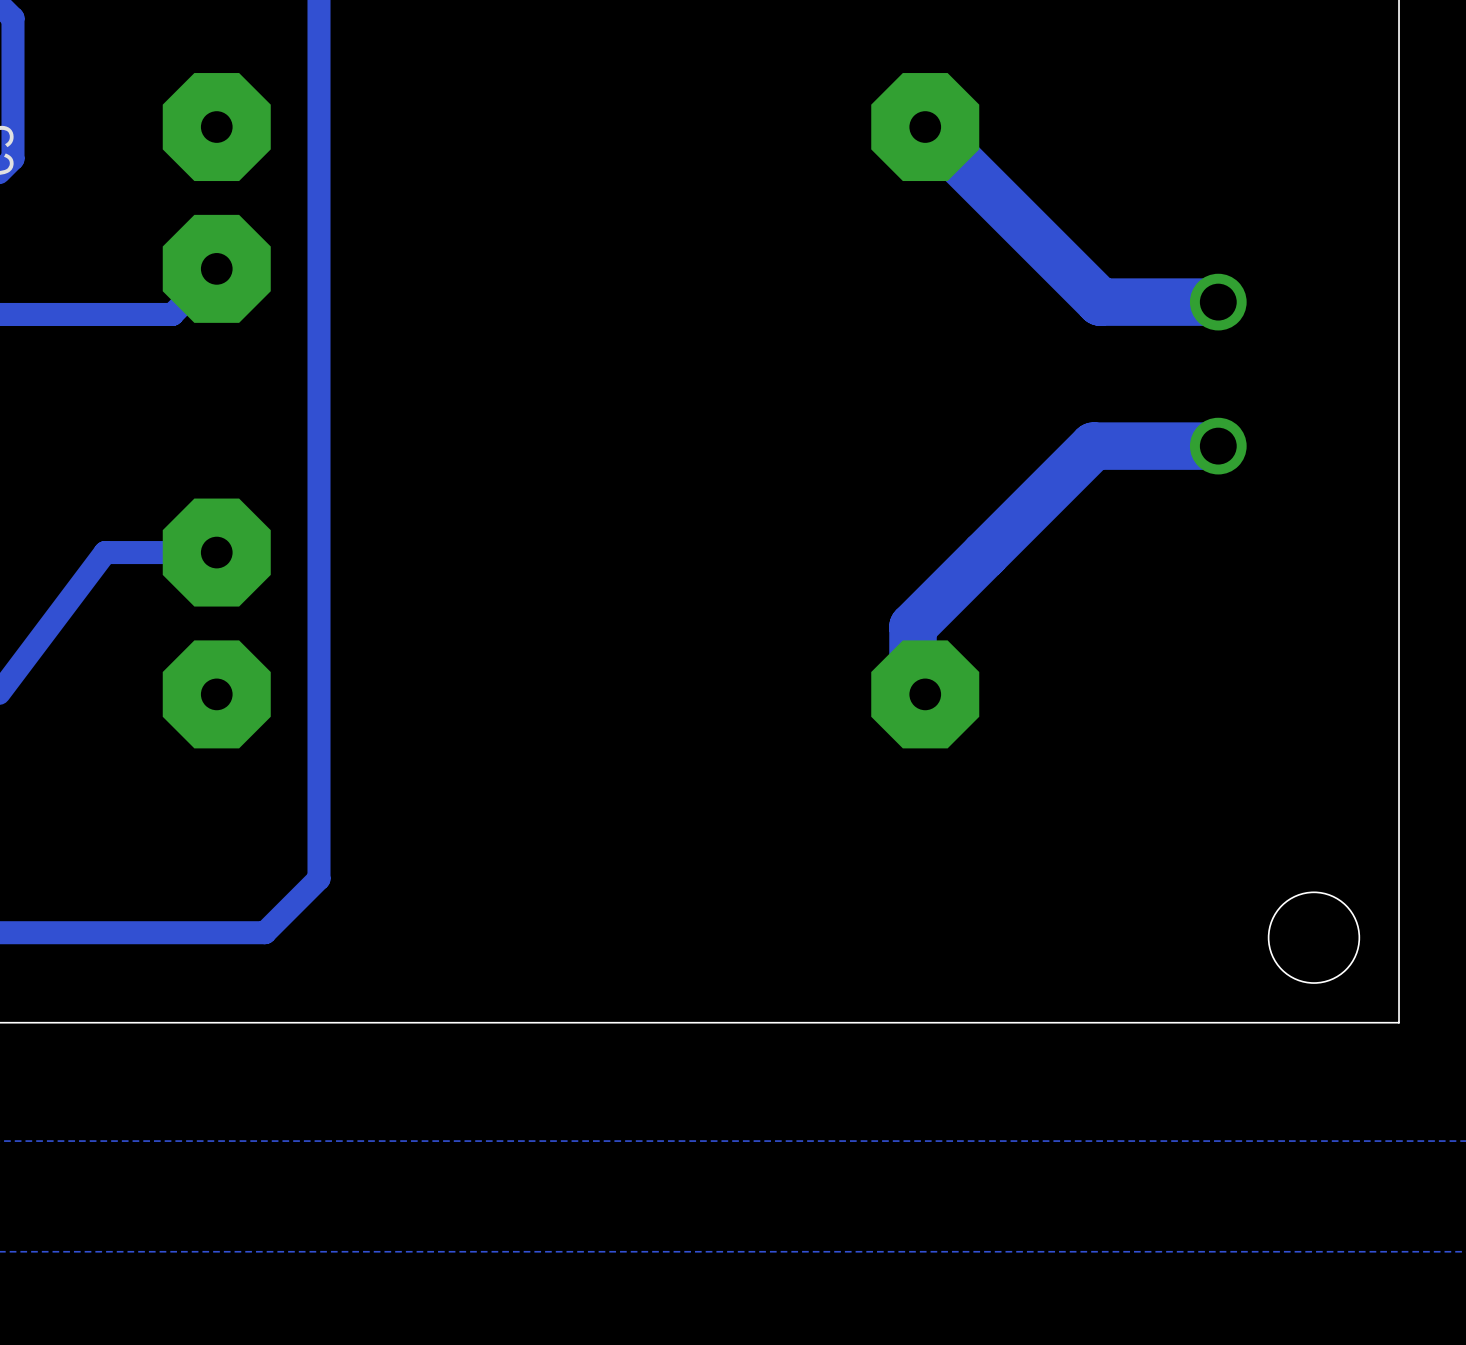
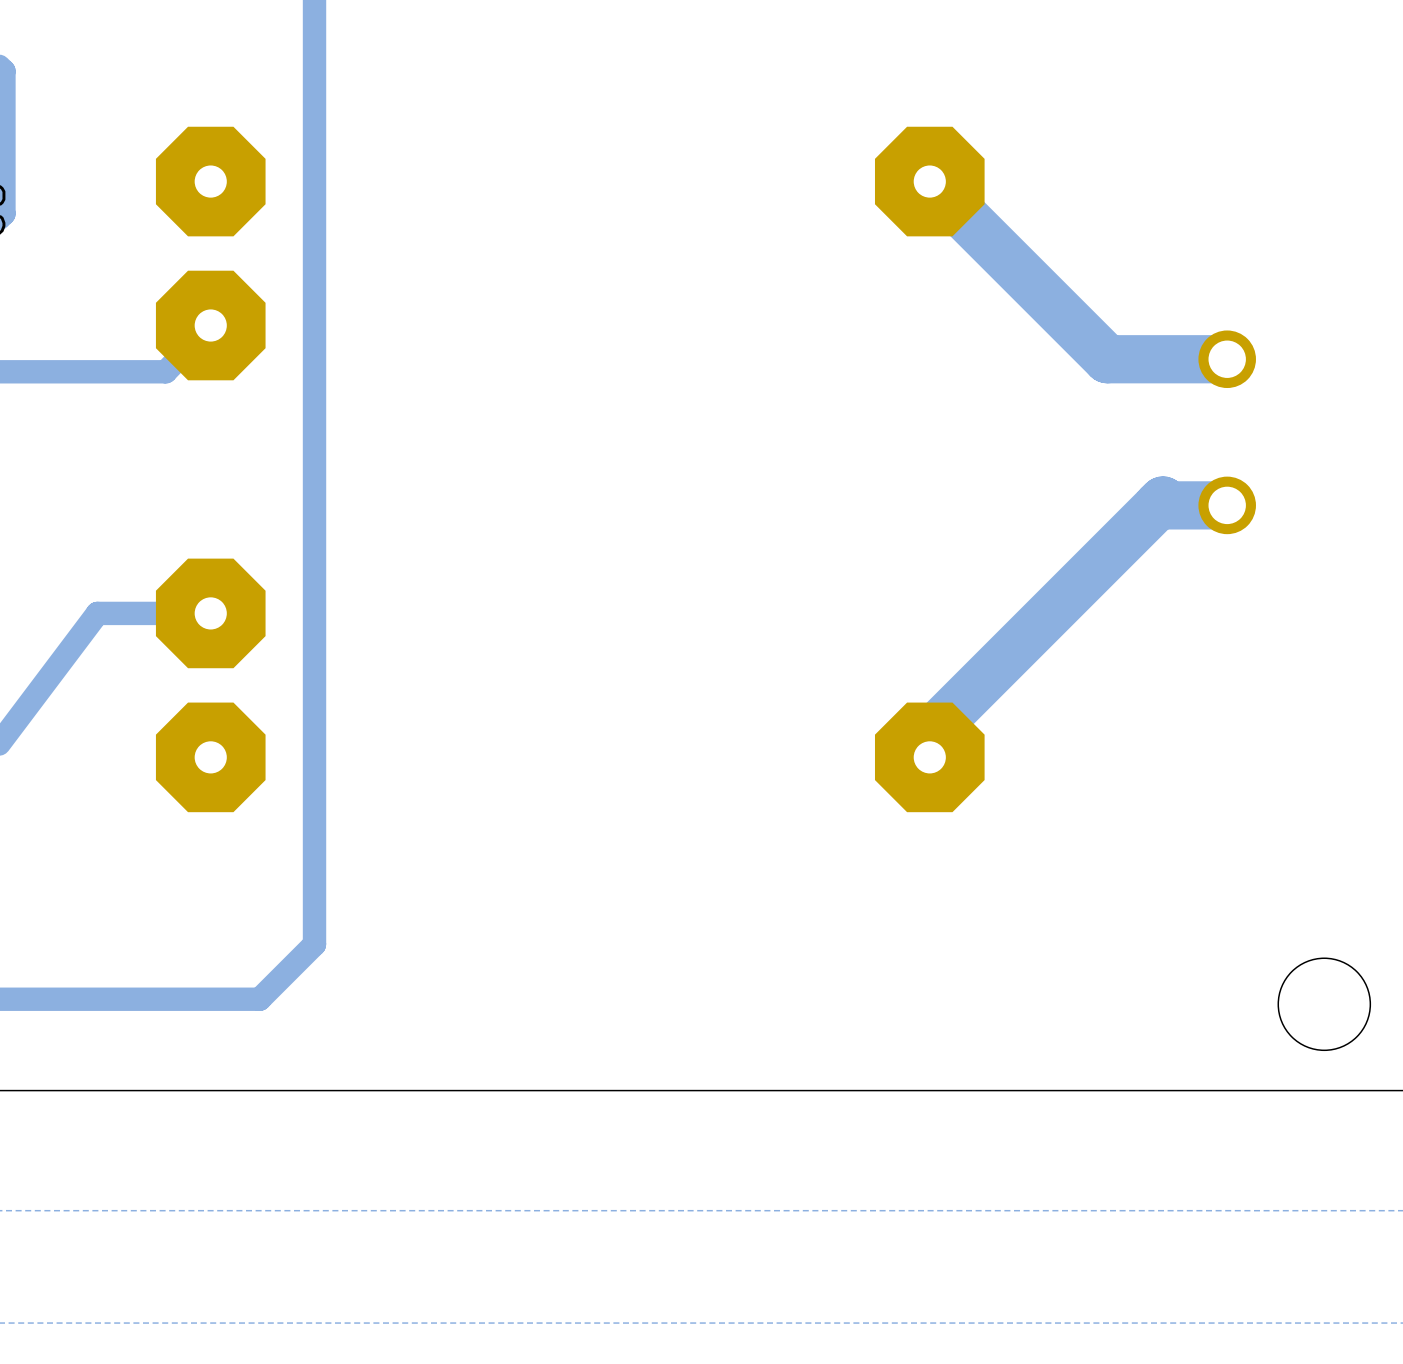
track: (1150, 446) (1093, 446) (913, 626) (913, 683) -> (1163, 500) (917, 746)

